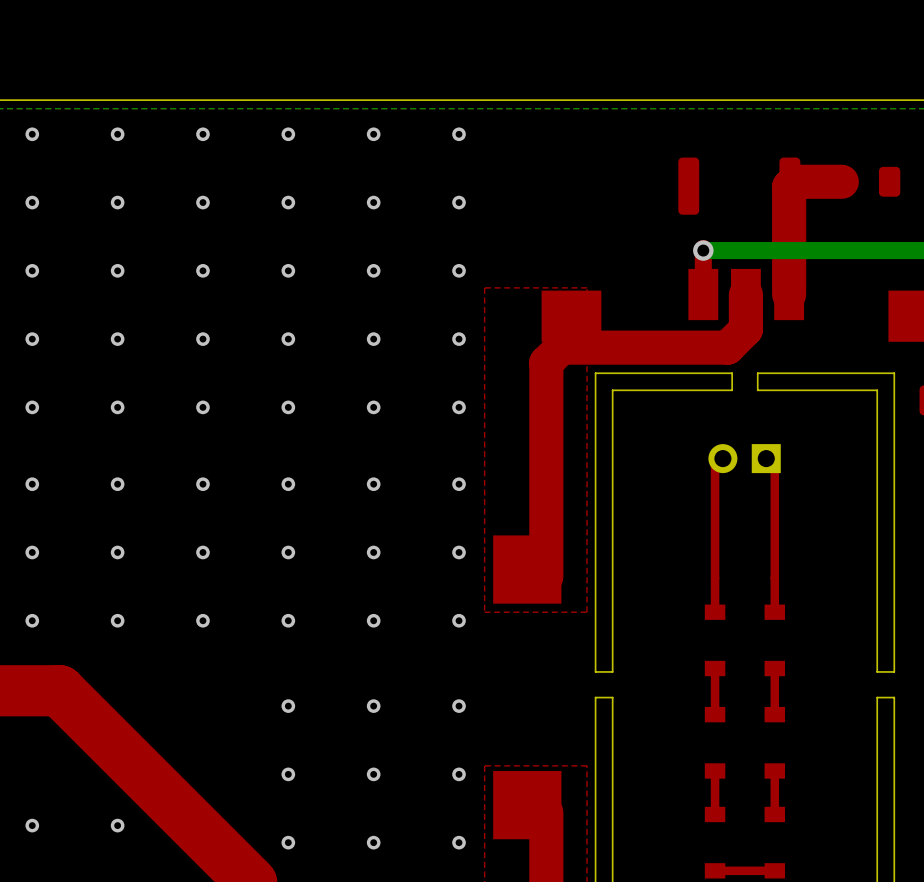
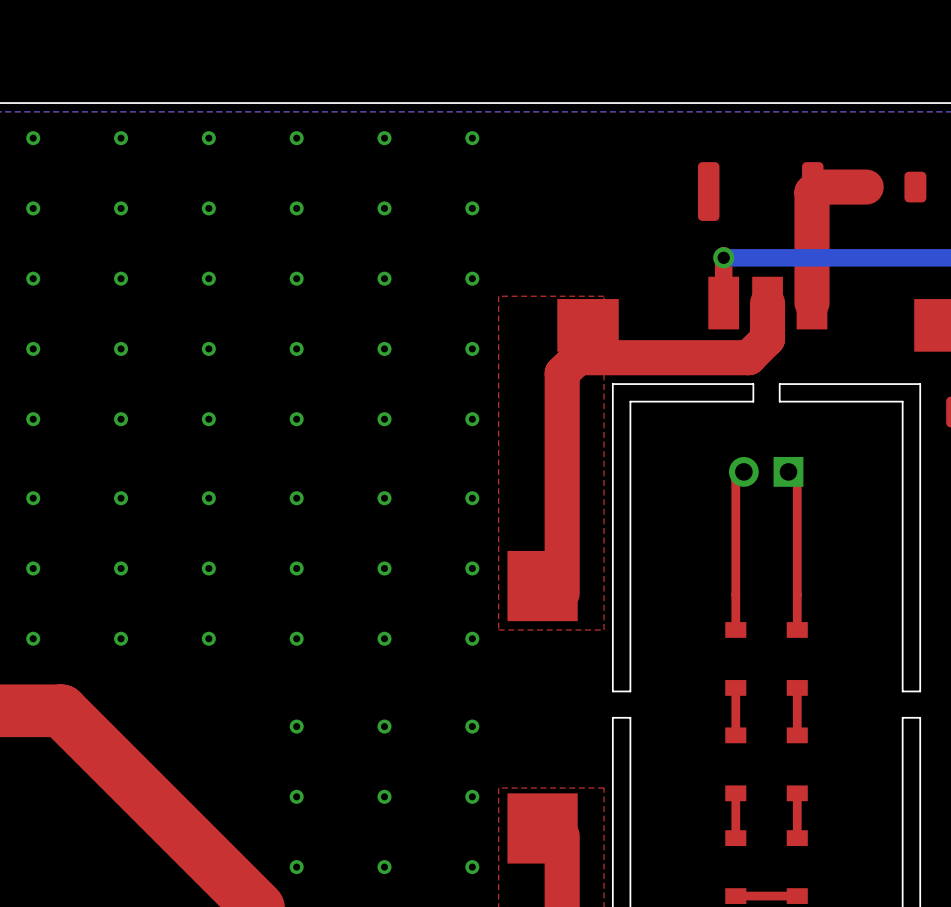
via: (32, 825) -> none
via: (117, 825) -> none

